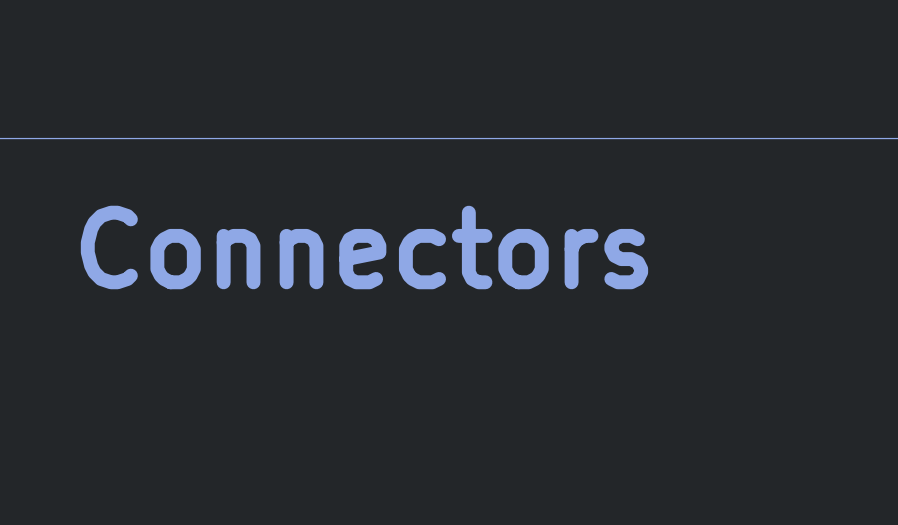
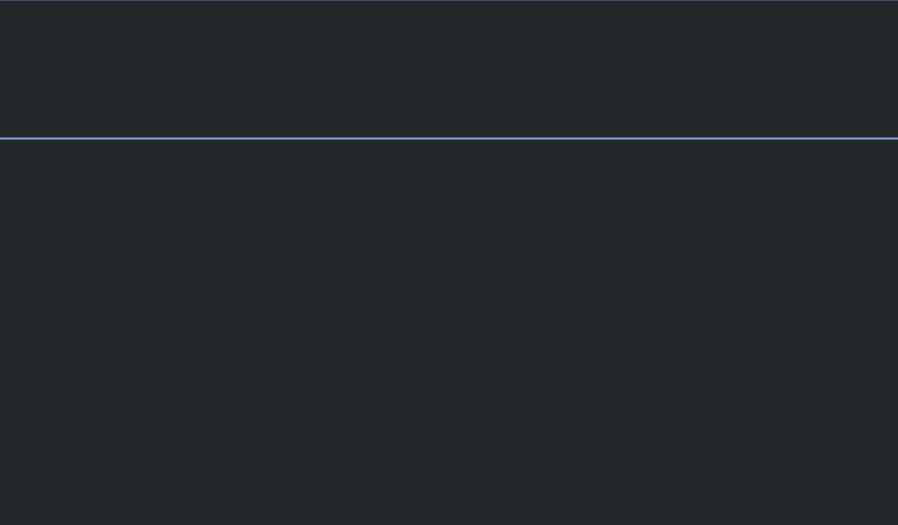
text: Connectors (364, 247) -> none

